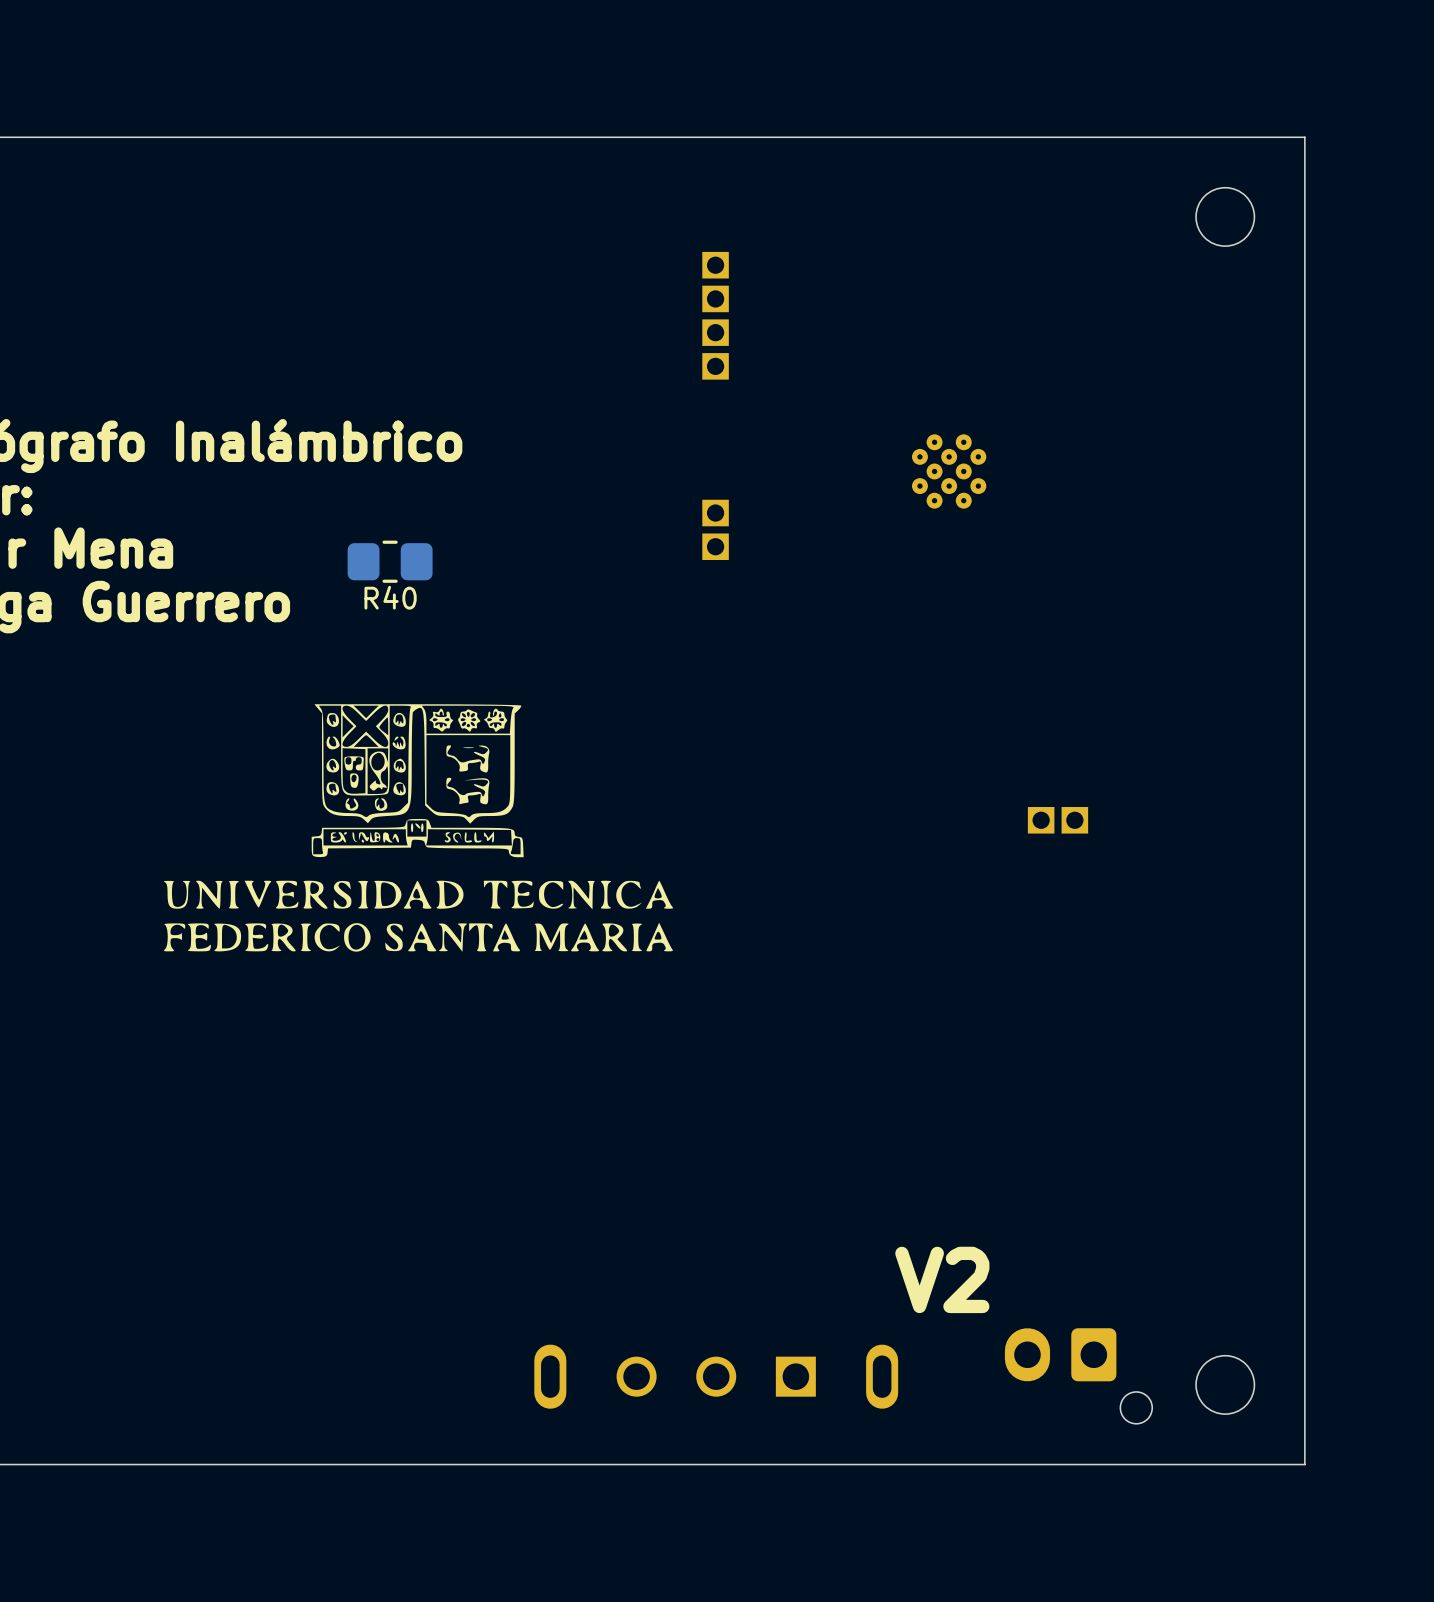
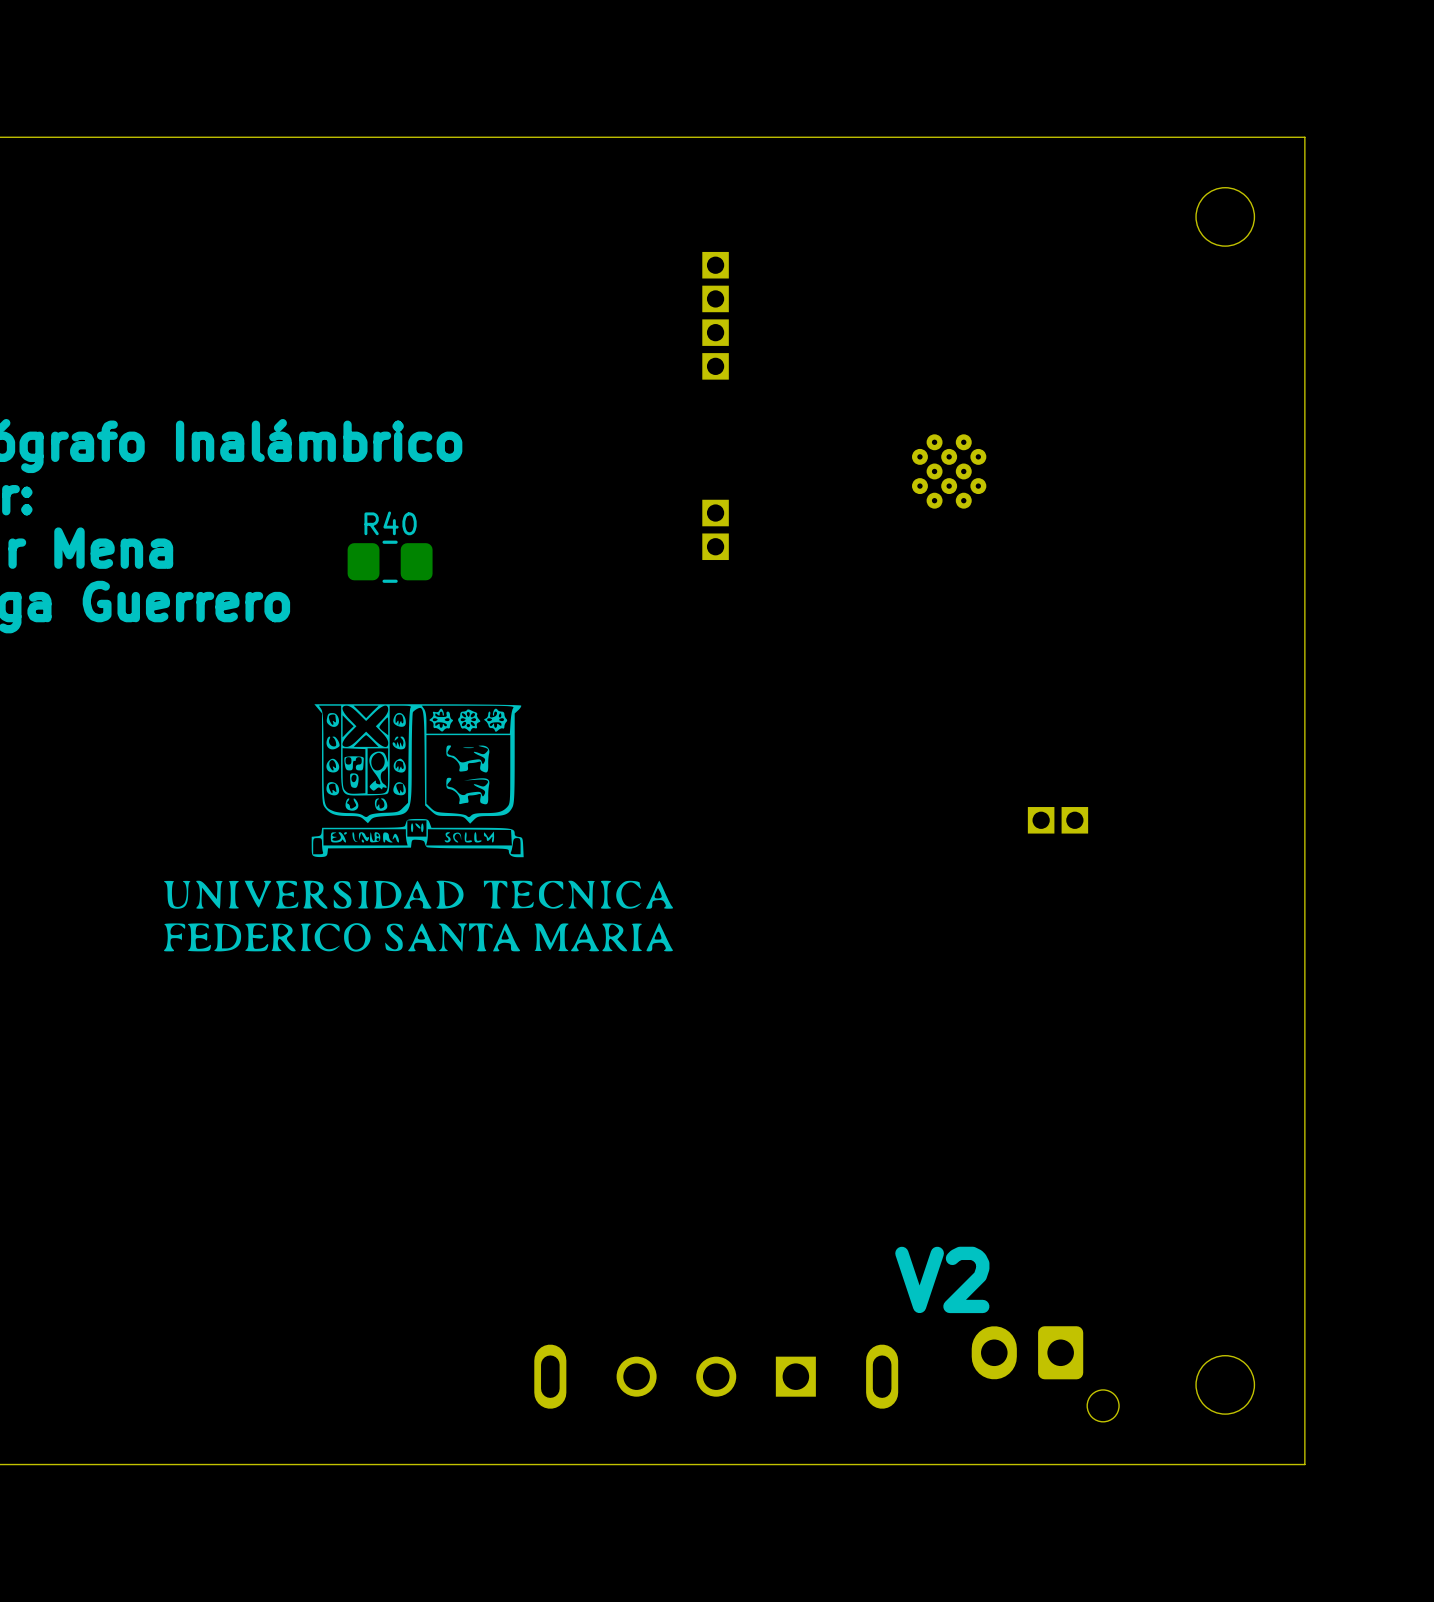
R40 name position: R40 (390, 597) -> R40 (390, 523)
part position: (1078, 1376) -> (1045, 1374)

